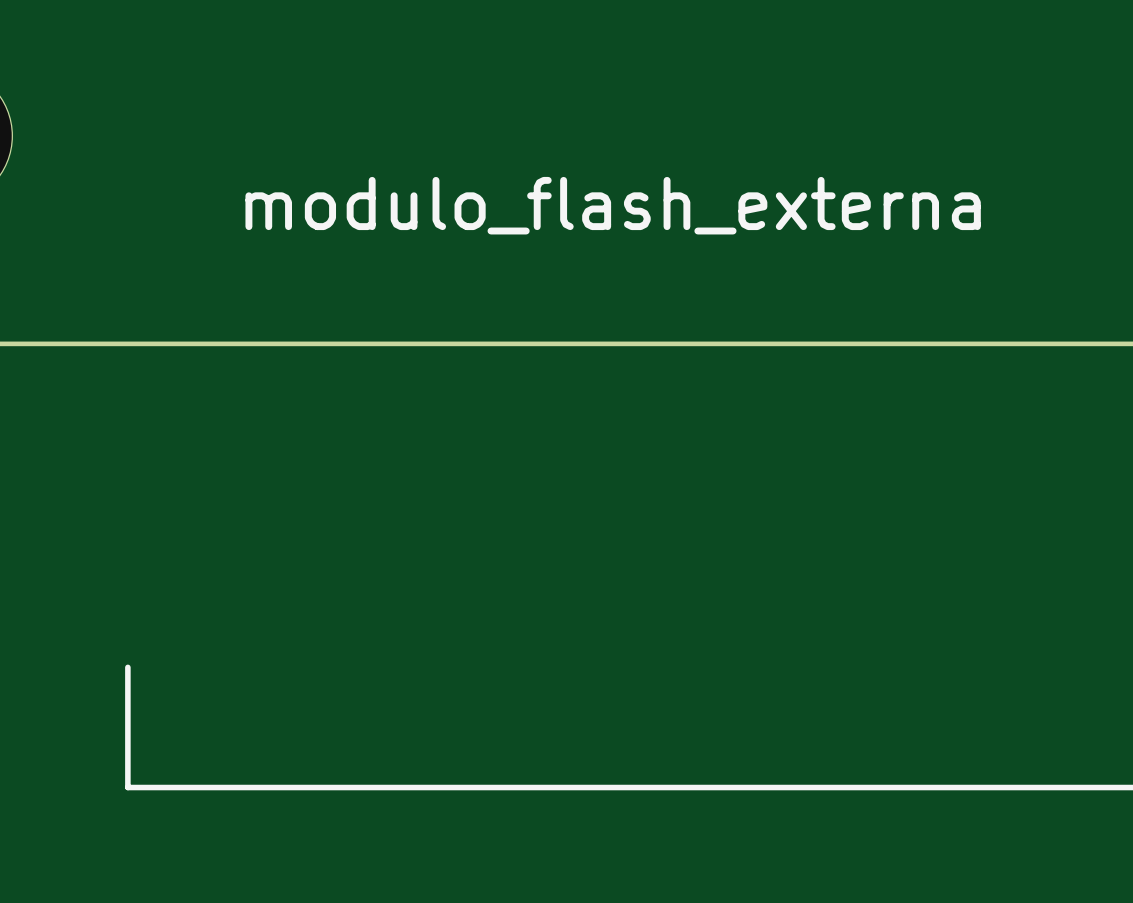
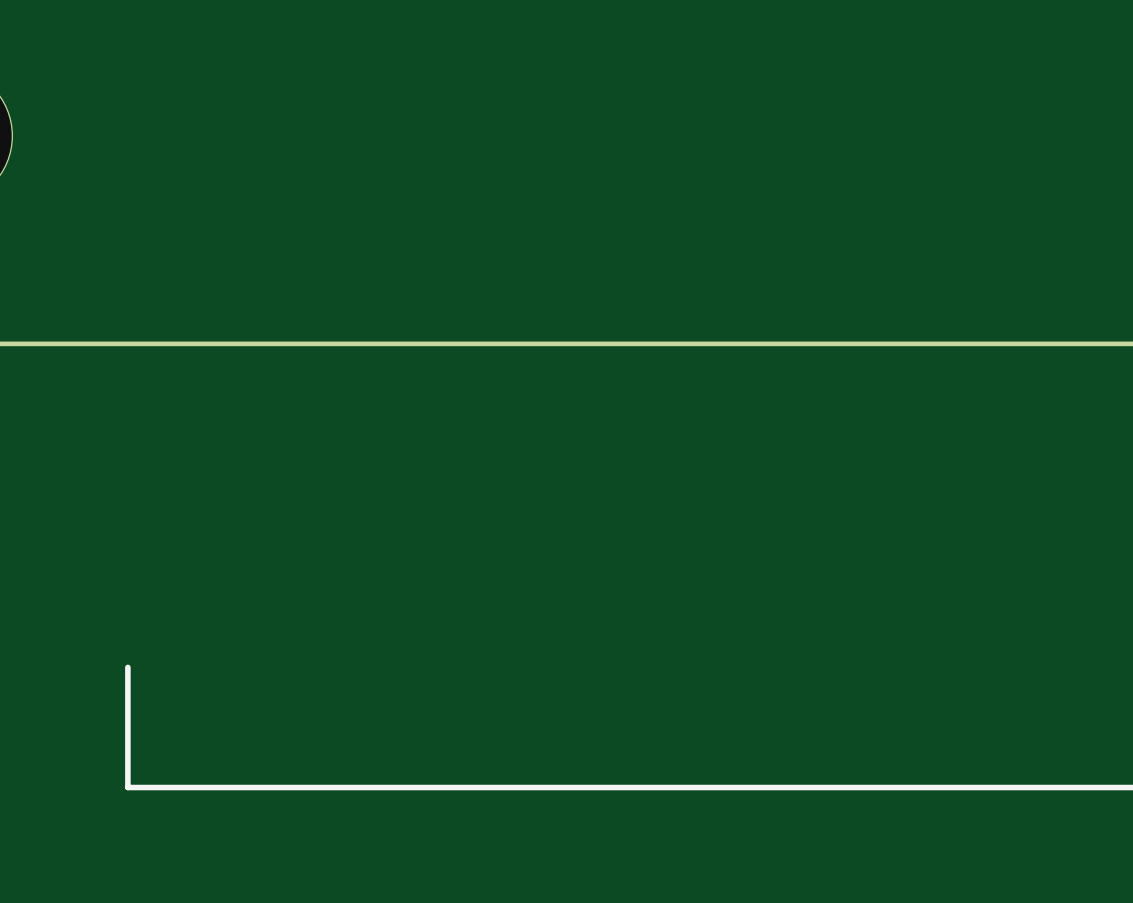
part value: modulo_flash_externa (613, 205) -> none

